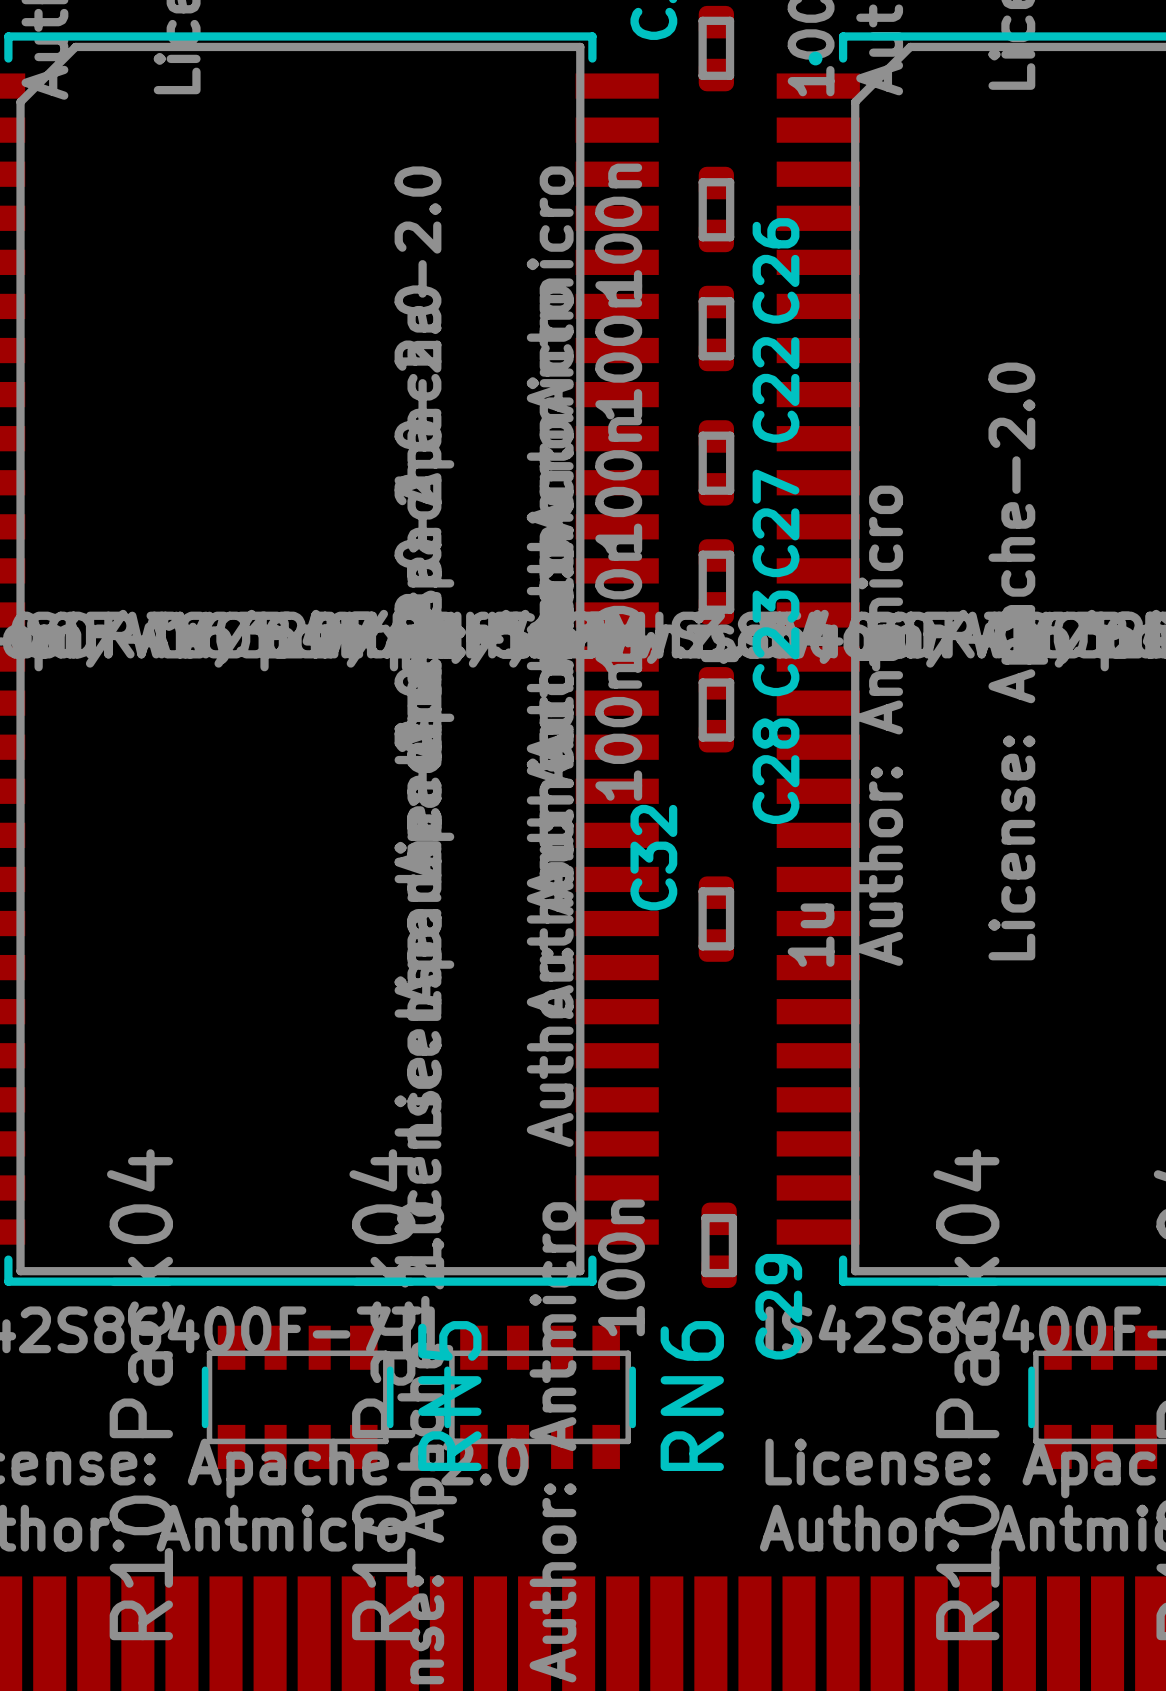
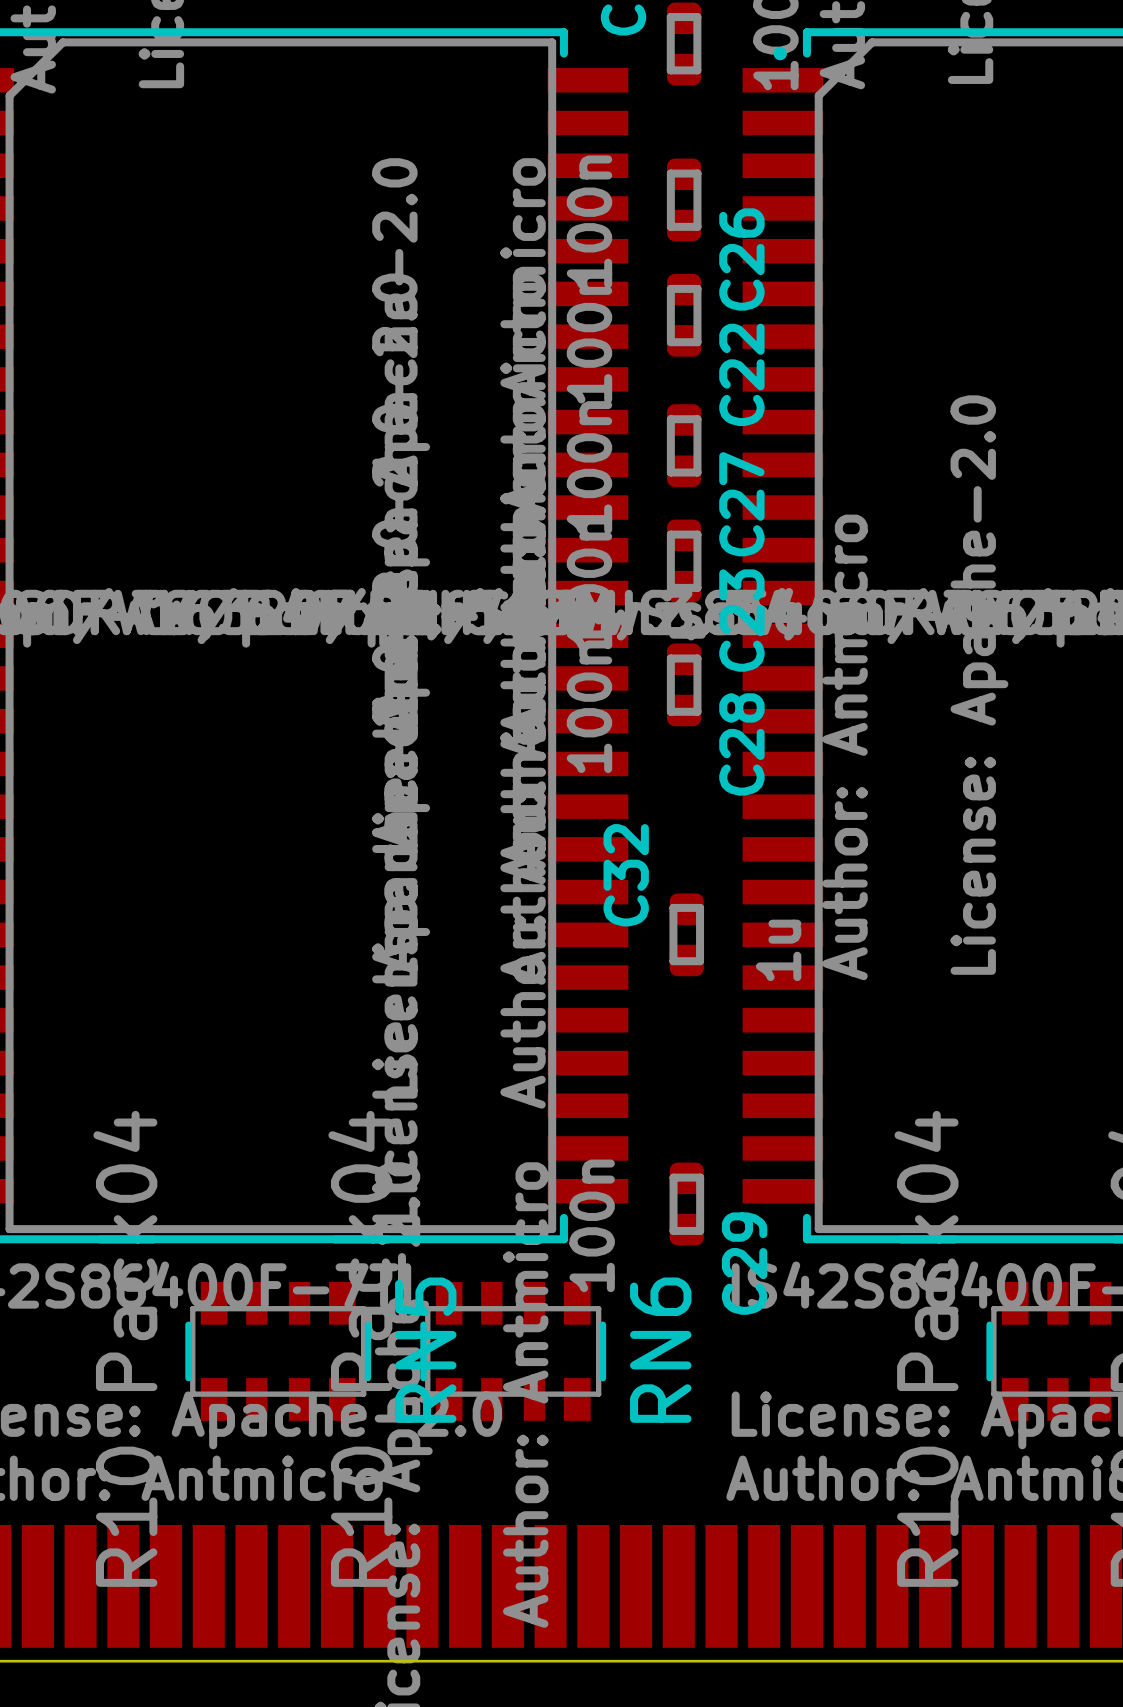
C32 position: (716, 919) -> (686, 934)

